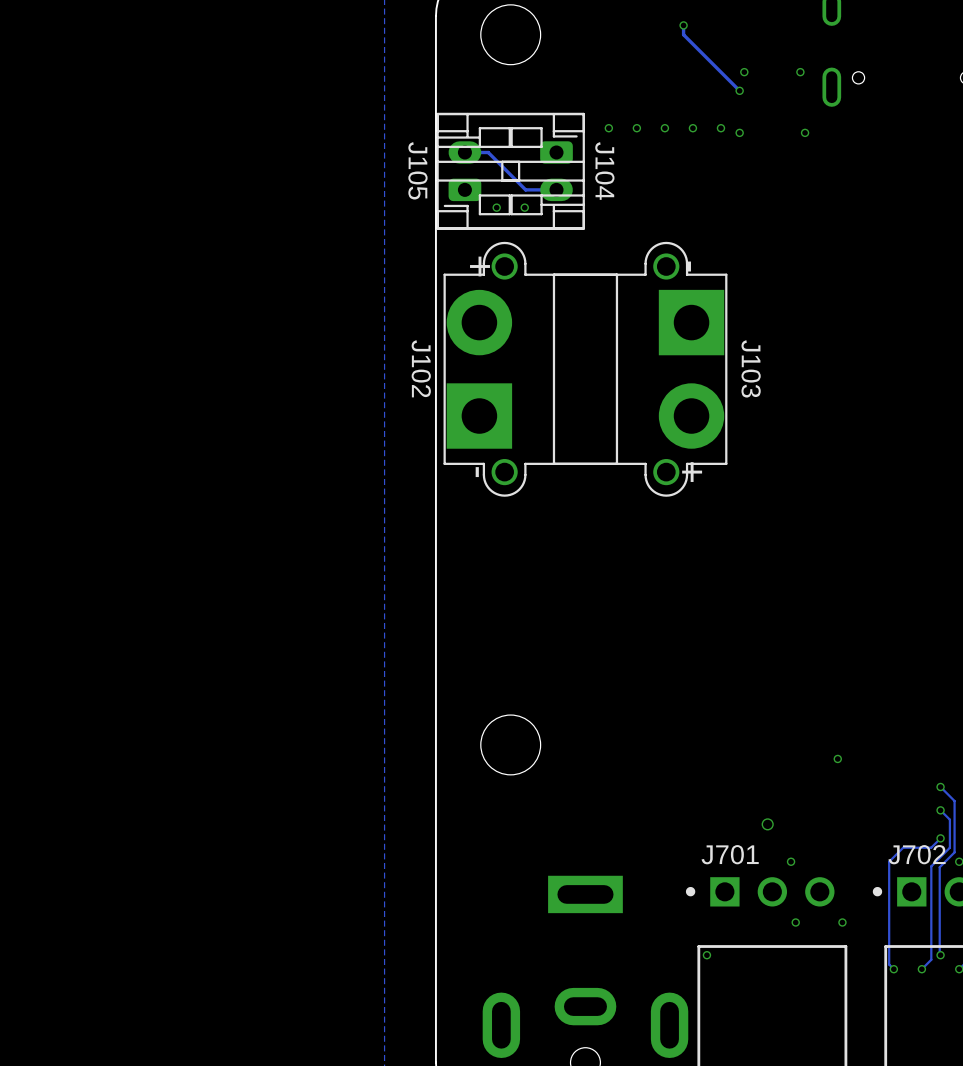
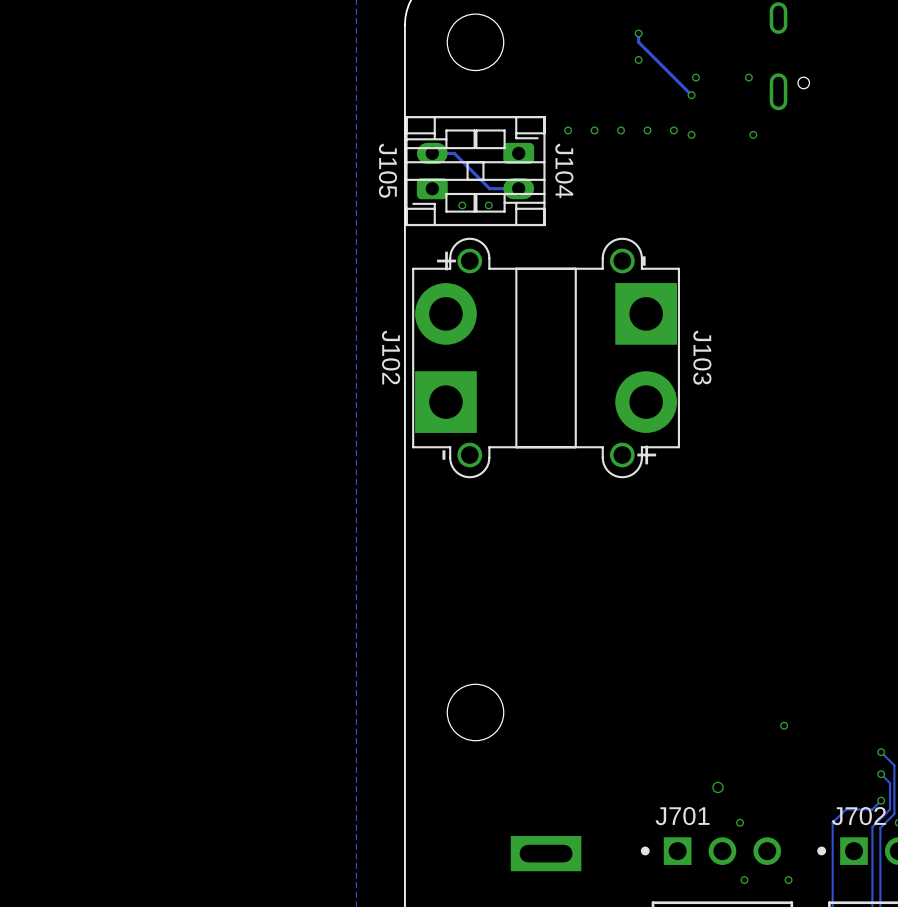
via: none -> (638, 59)

